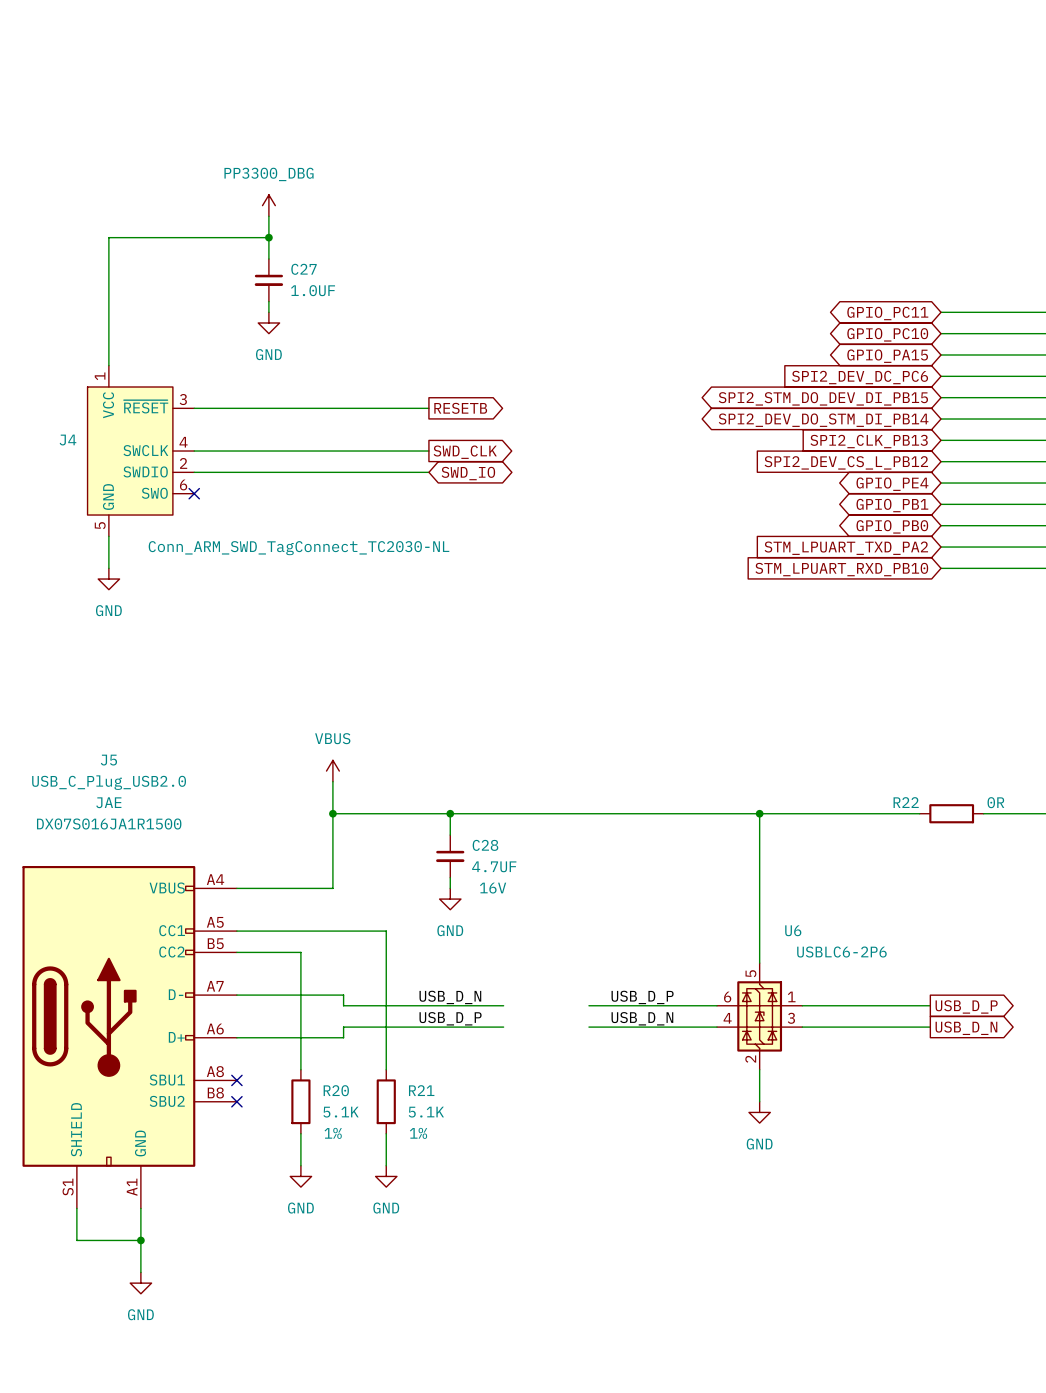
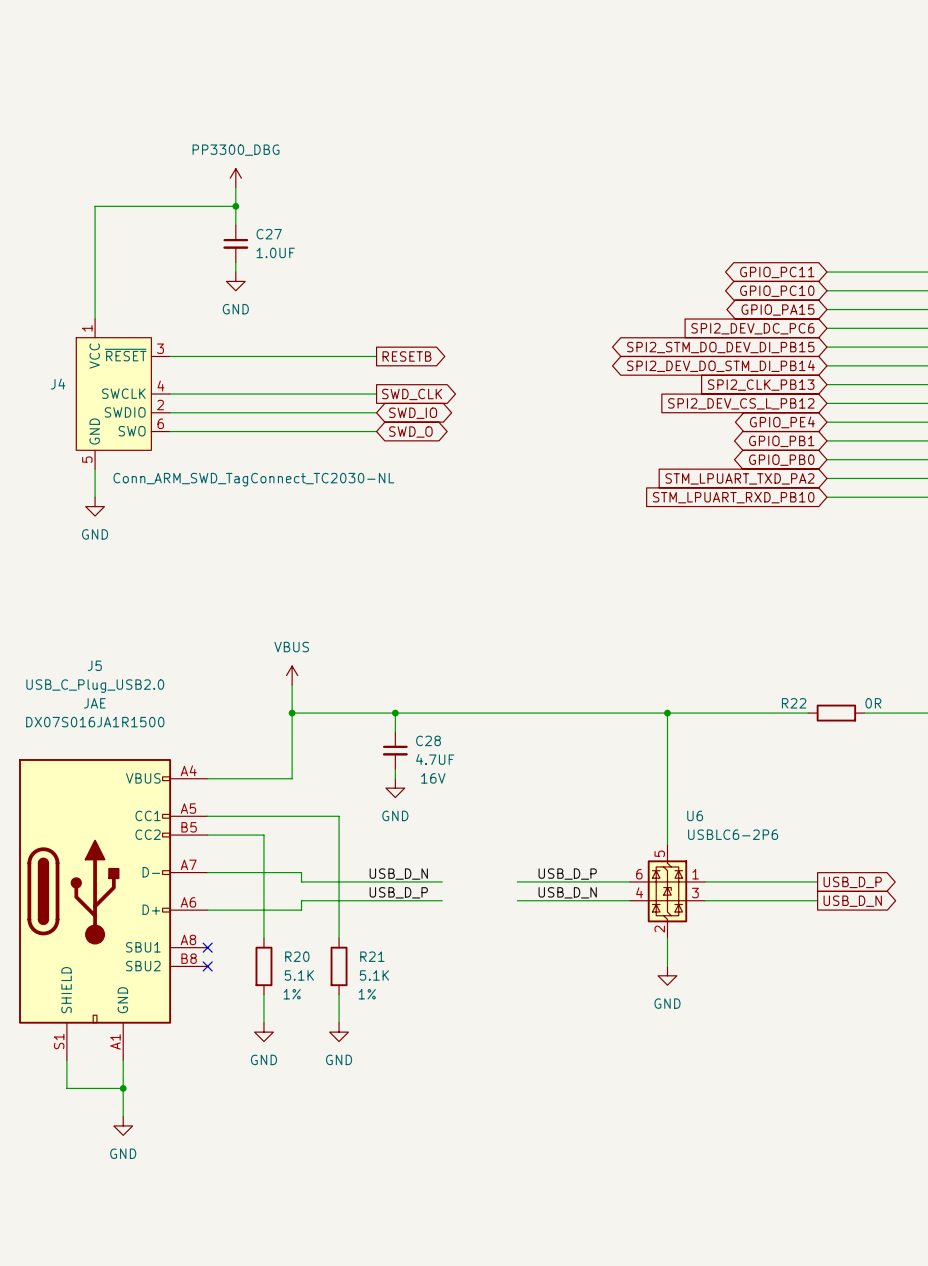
wire: none -> (170, 431) (376, 431)
no-connect mark: (194, 493) -> none
global label: none -> SWD_O (410, 431)

